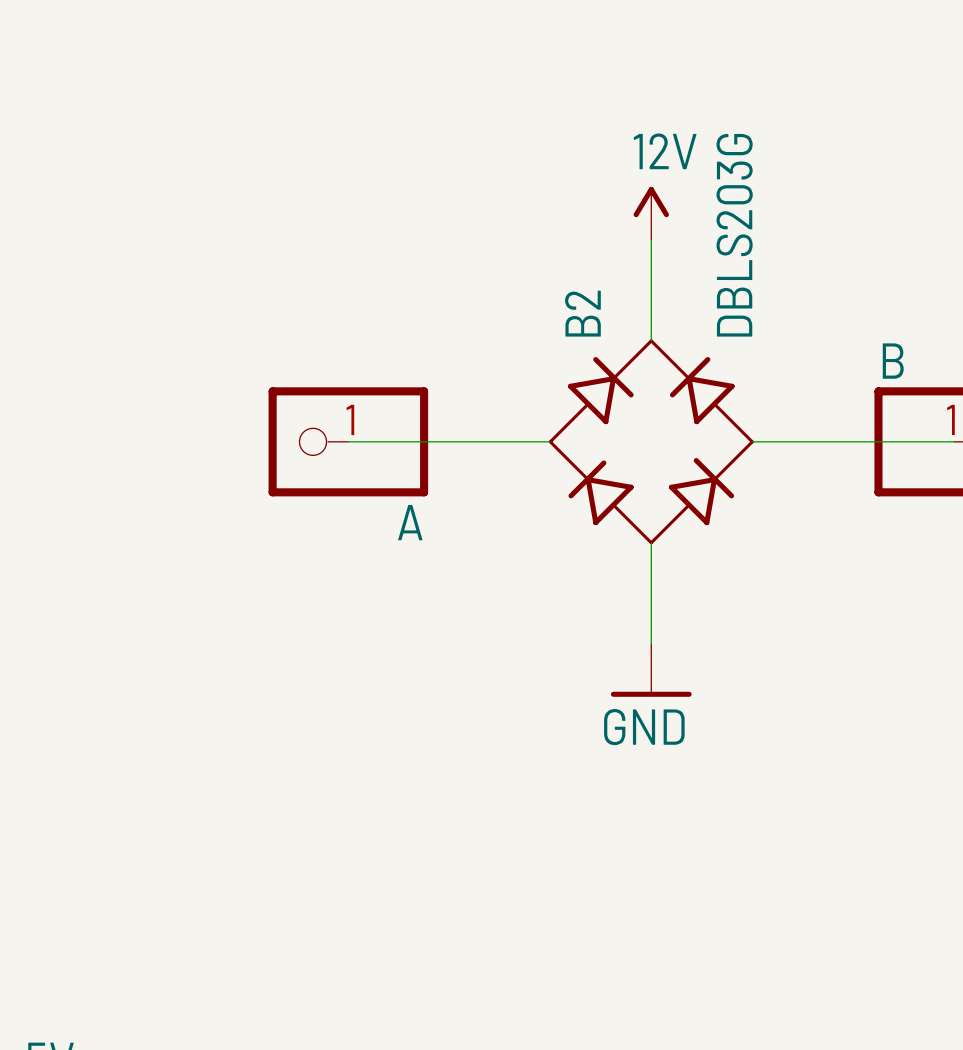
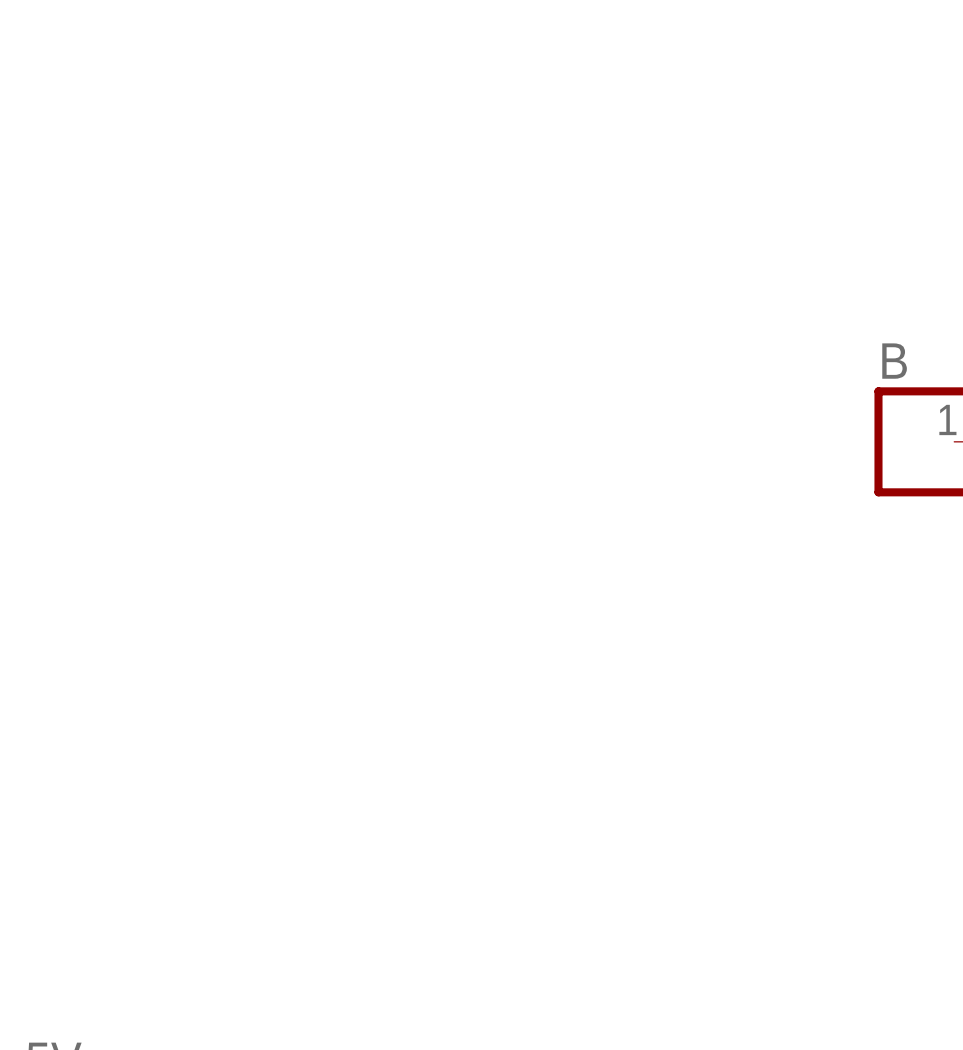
power symbol: 12V (651, 213) -> none
wire: (651, 239) (651, 340) -> none
wire: (348, 441) (550, 441) -> none
A: (348, 441) -> none
B2: DBLS203G (651, 441) -> none
wire: (752, 441) (954, 441) -> none
wire: (651, 542) (651, 643) -> none
power symbol: GND (651, 670) -> none

